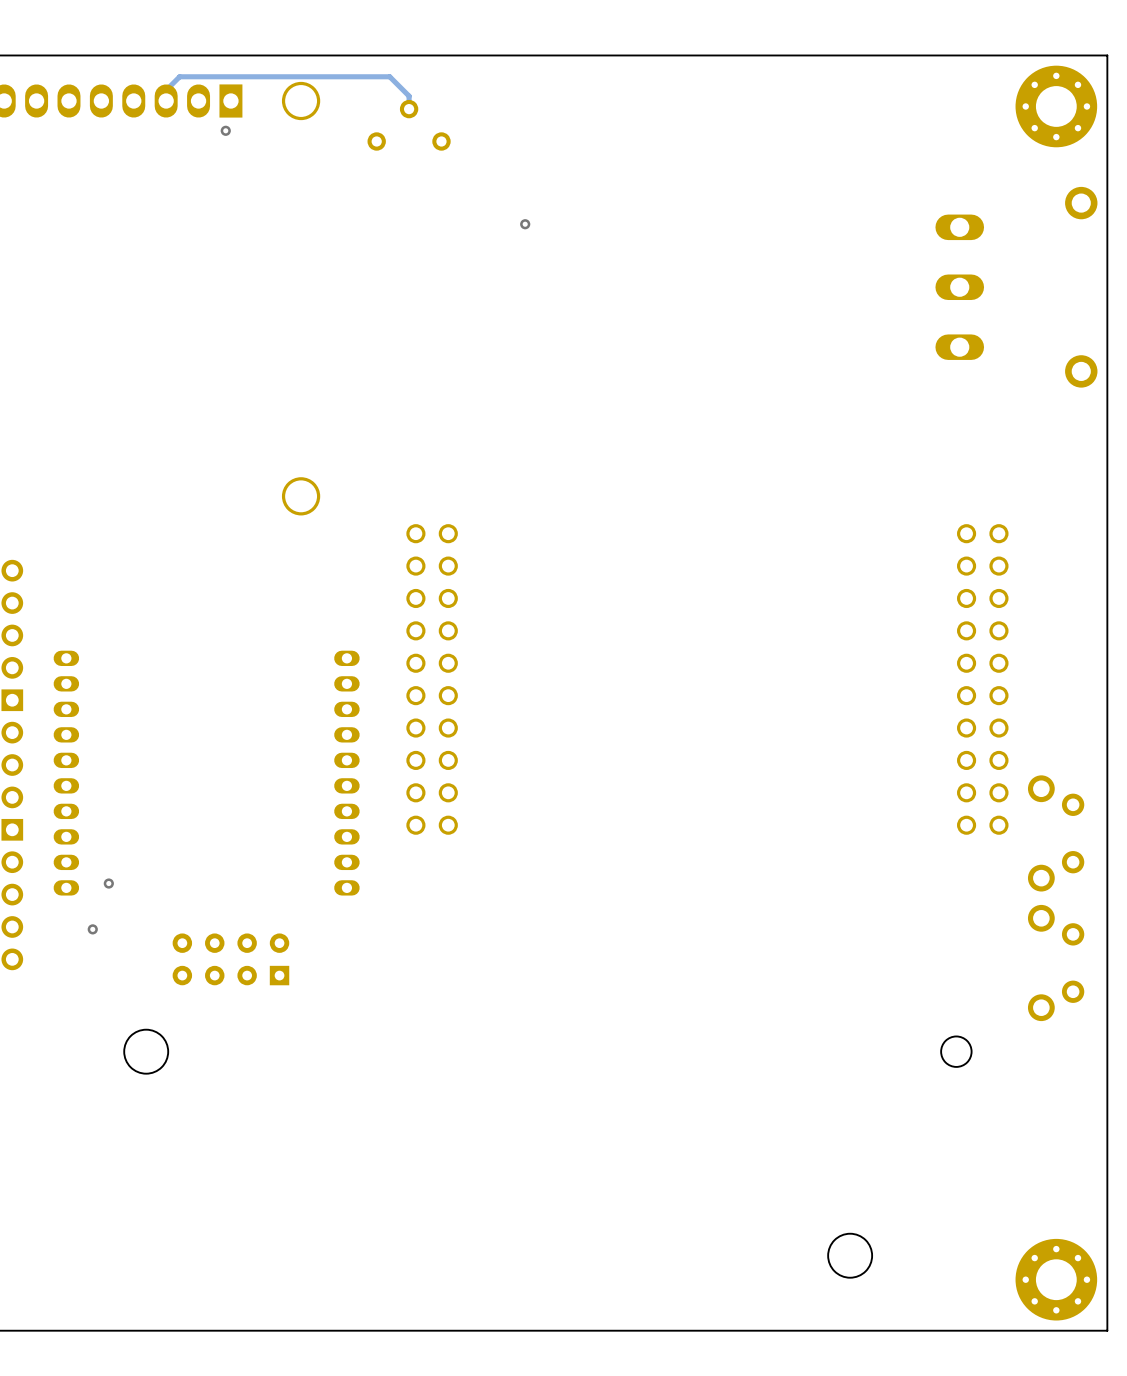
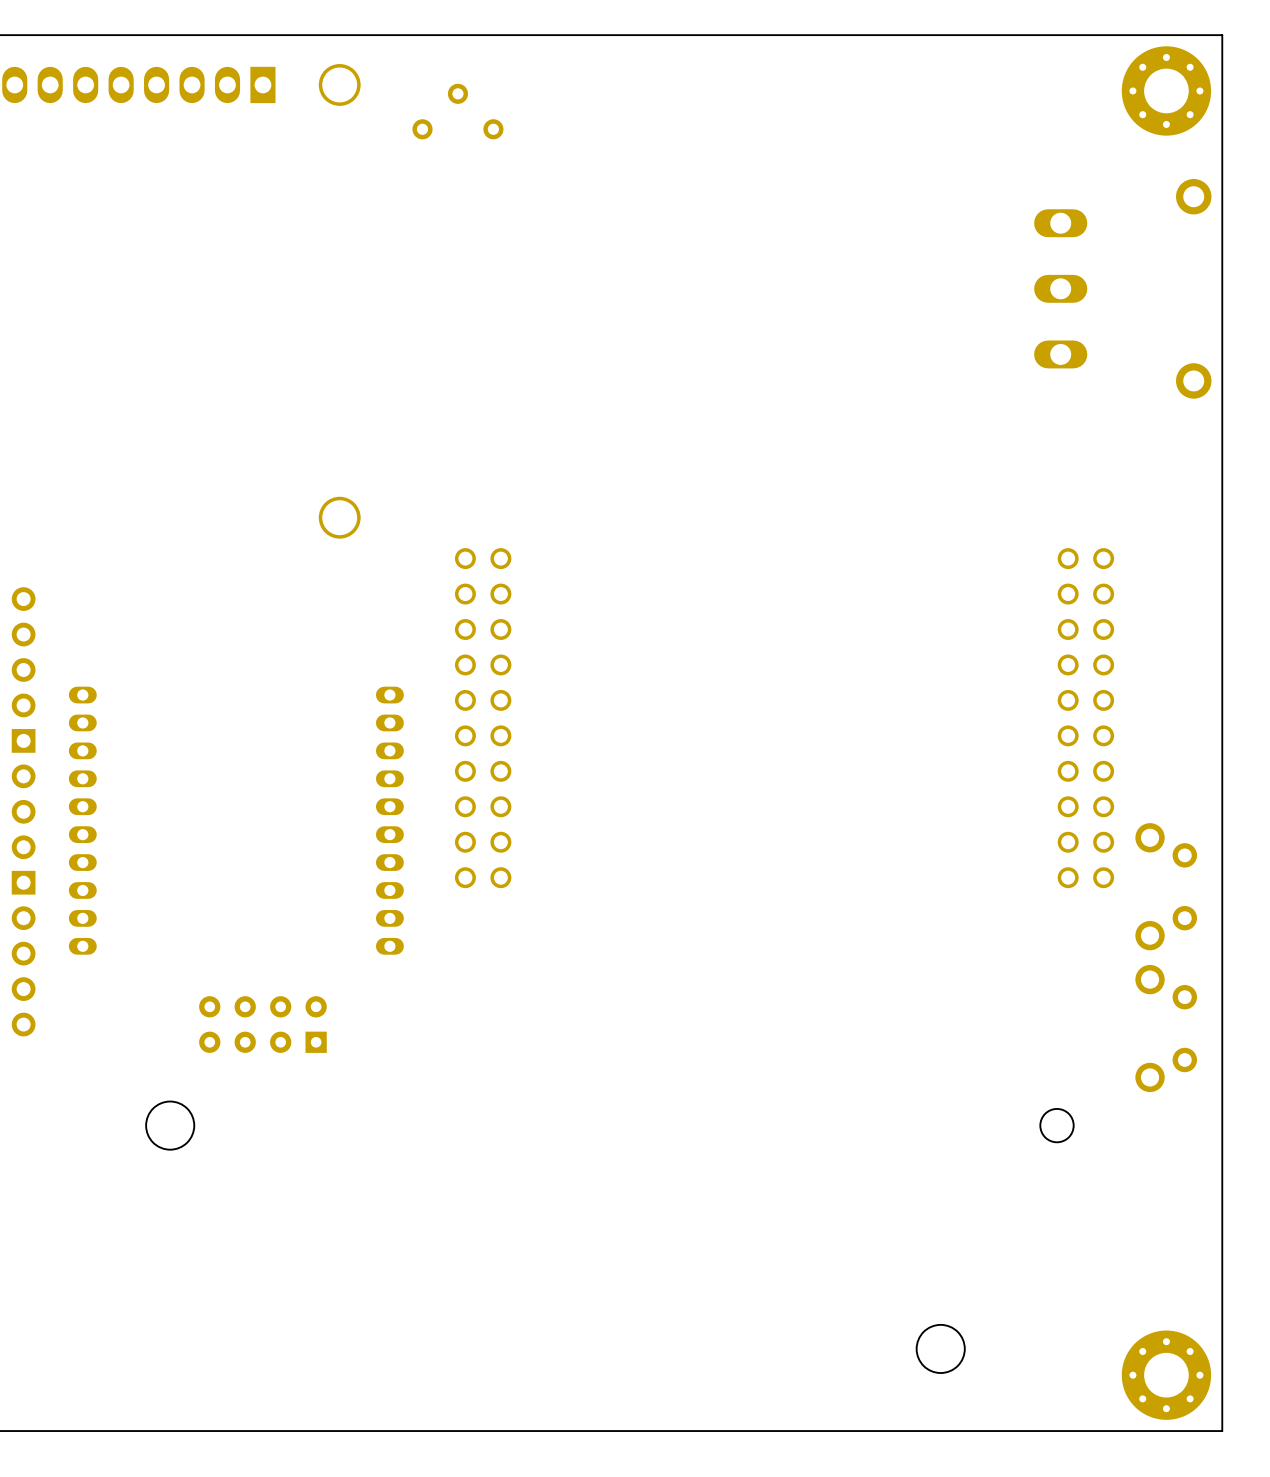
track: (166, 101) (166, 90) (179, 76) (389, 76) (409, 96) (409, 109) -> none
via: (225, 130) -> none
via: (525, 224) -> none
via: (108, 883) -> none
via: (92, 929) -> none

